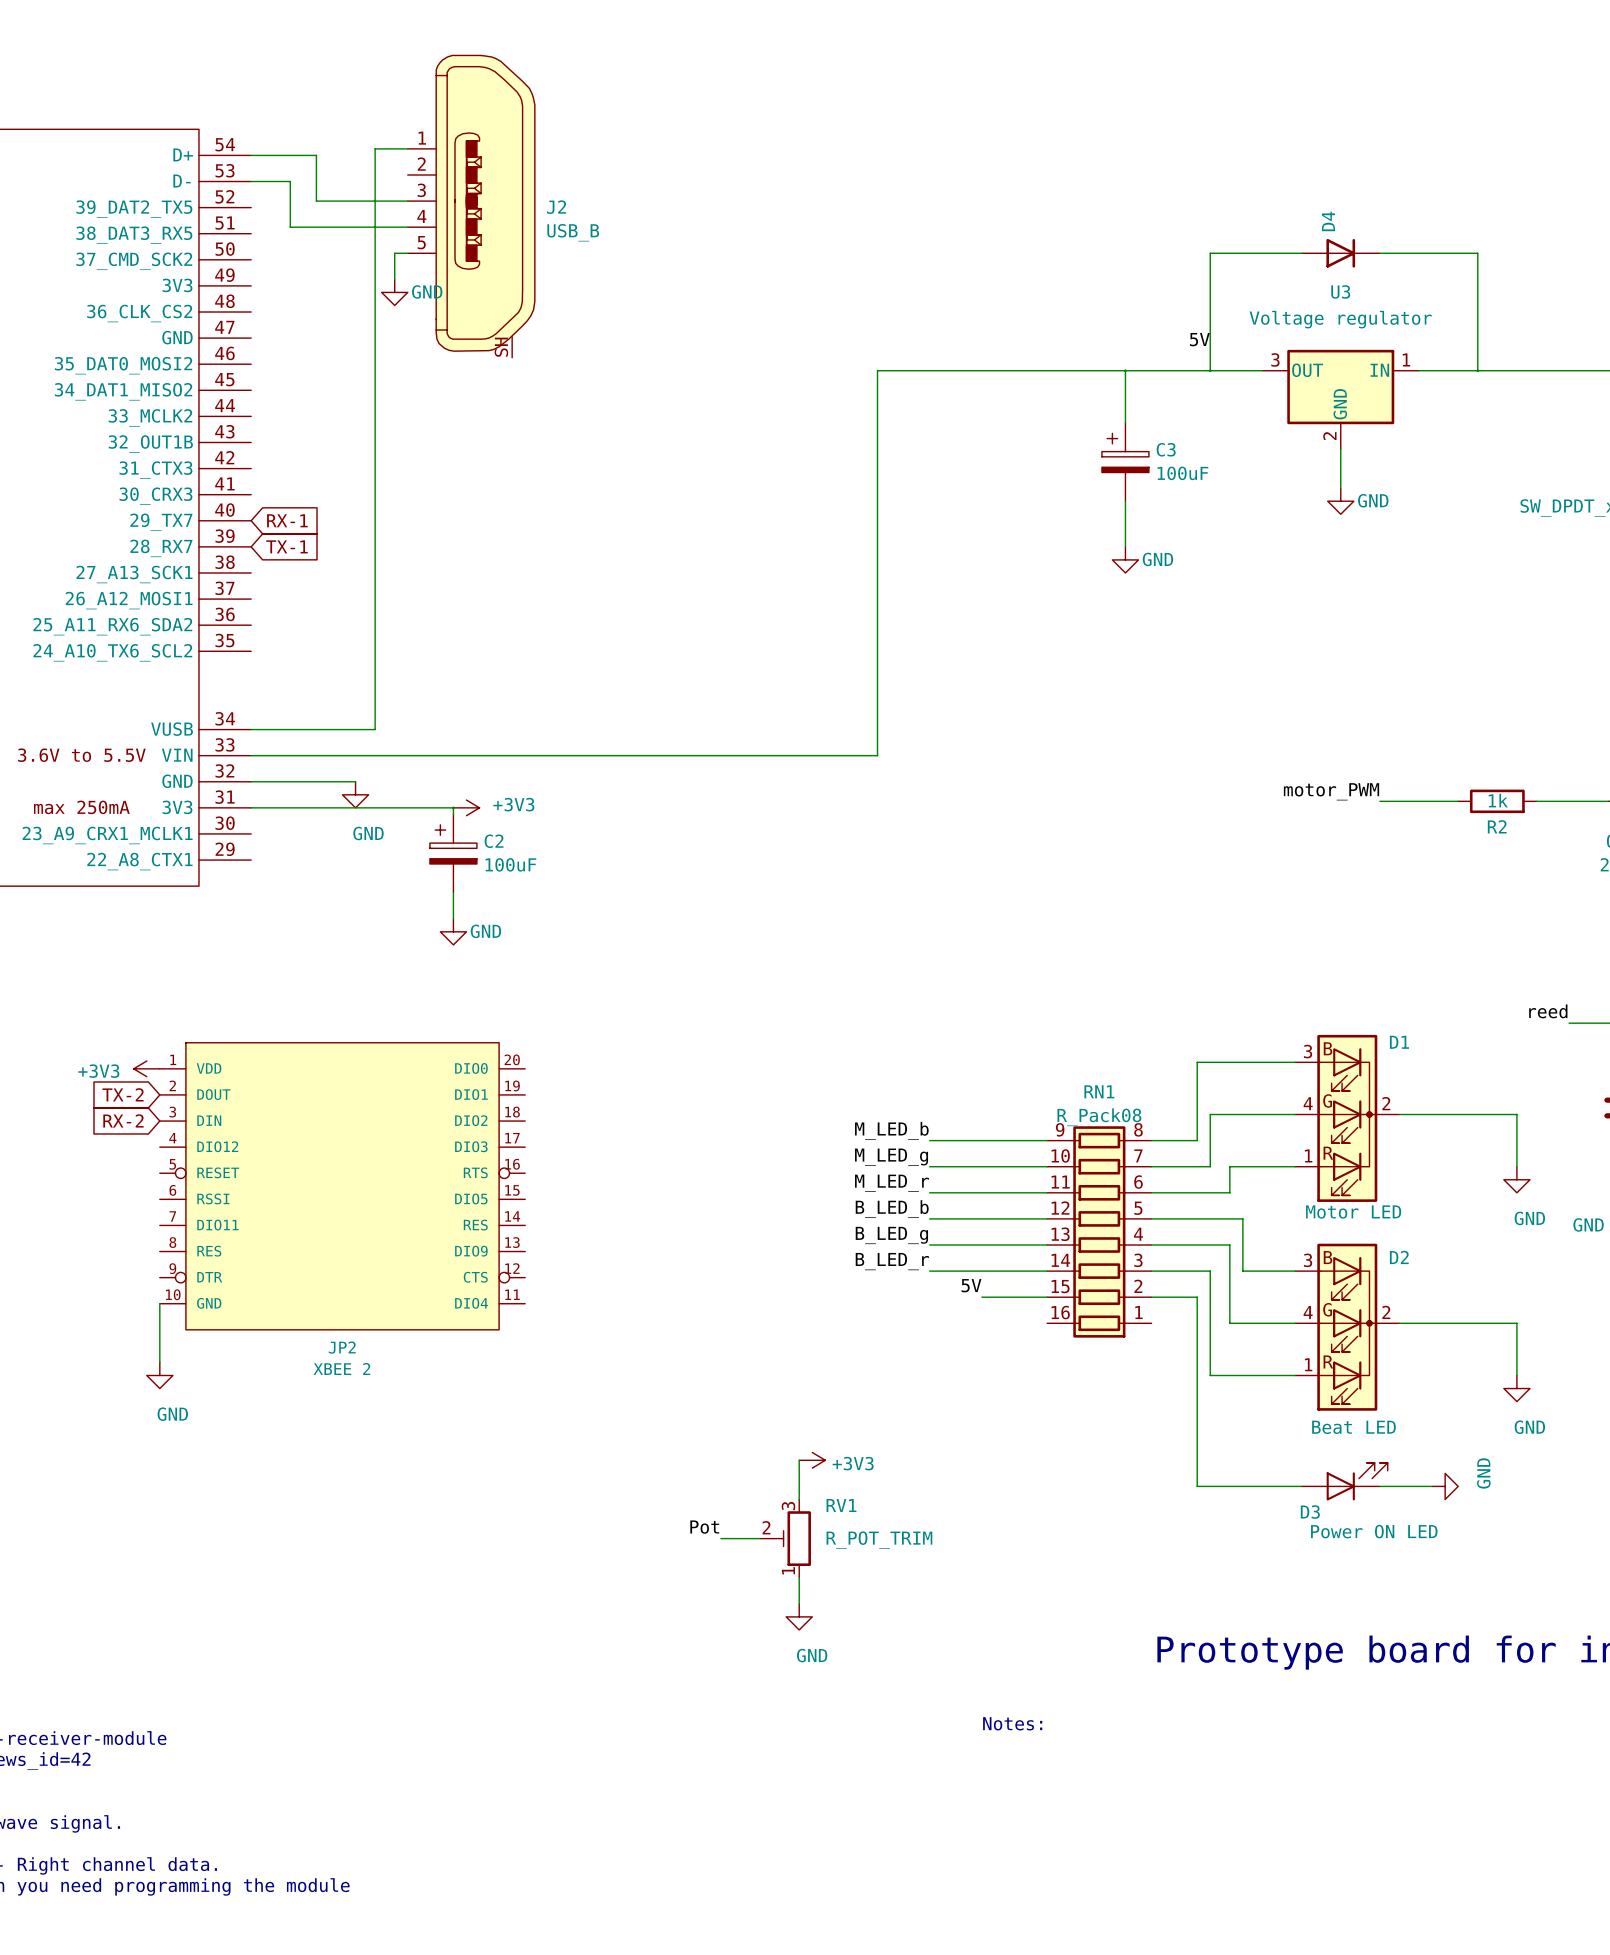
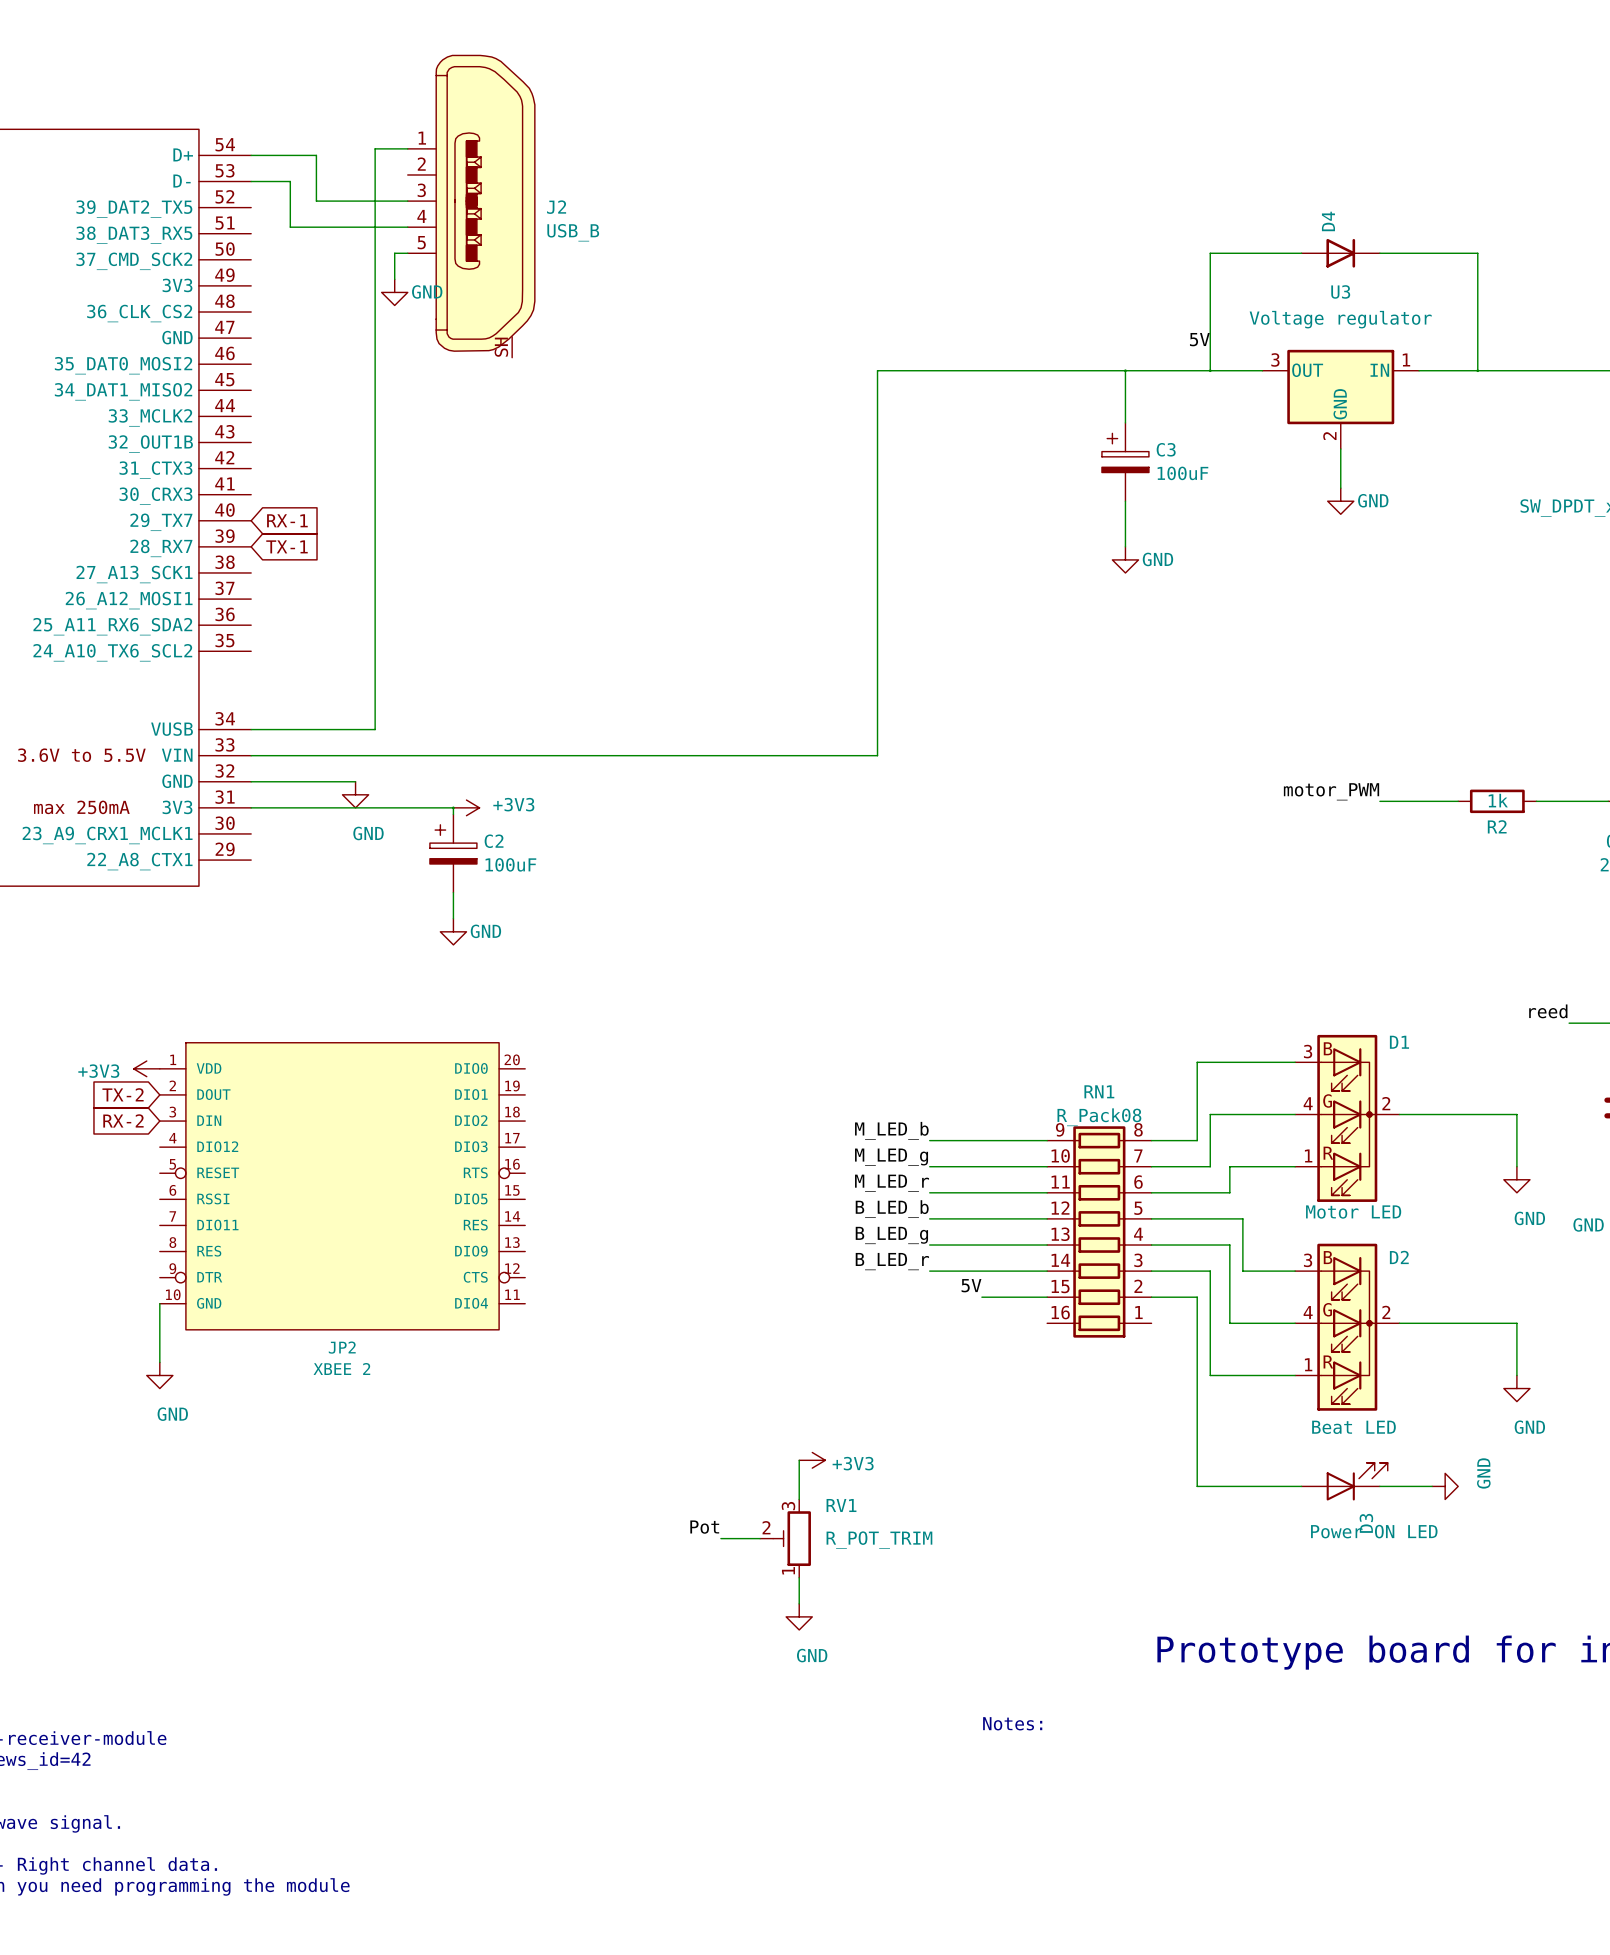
D3 name rotation: 0° (1310, 1512) -> 90° counterclockwise (1366, 1523)
D3 name position: D3 (1310, 1512) -> D3 (1366, 1523)

